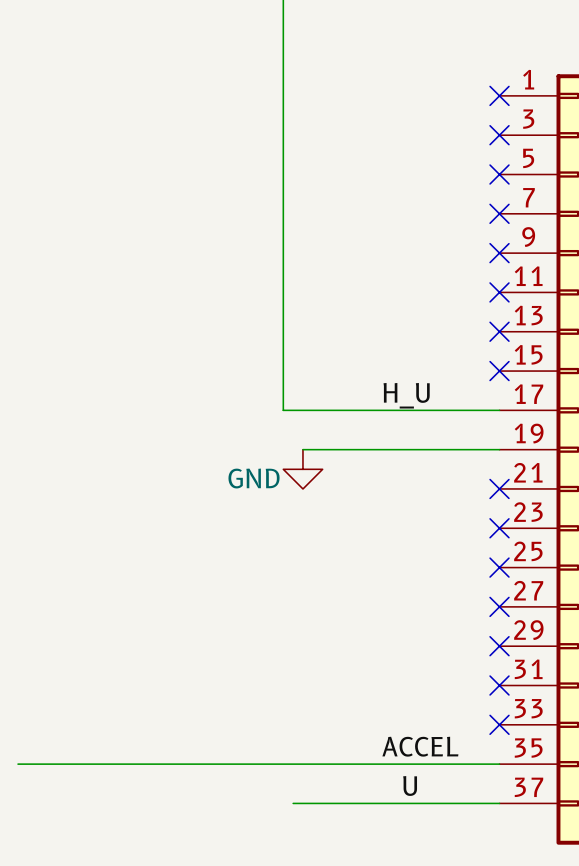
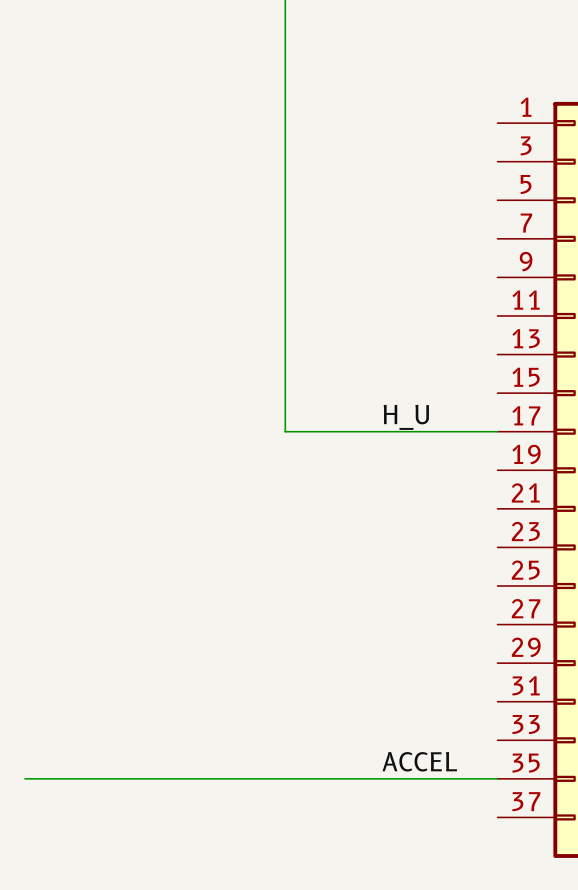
no-connect mark: (499, 95) -> none
no-connect mark: (499, 135) -> none
no-connect mark: (499, 174) -> none
no-connect mark: (499, 213) -> none
no-connect mark: (499, 253) -> none
no-connect mark: (499, 292) -> none
no-connect mark: (499, 331) -> none
no-connect mark: (499, 371) -> none
wire: (302, 449) (499, 449) -> none
power symbol: GND (302, 469) -> none
no-connect mark: (499, 488) -> none
no-connect mark: (499, 528) -> none
no-connect mark: (499, 567) -> none
no-connect mark: (499, 606) -> none
no-connect mark: (499, 646) -> none
no-connect mark: (499, 685) -> none
no-connect mark: (499, 724) -> none
label: U (410, 786) -> none
wire: (293, 803) (499, 803) -> none

